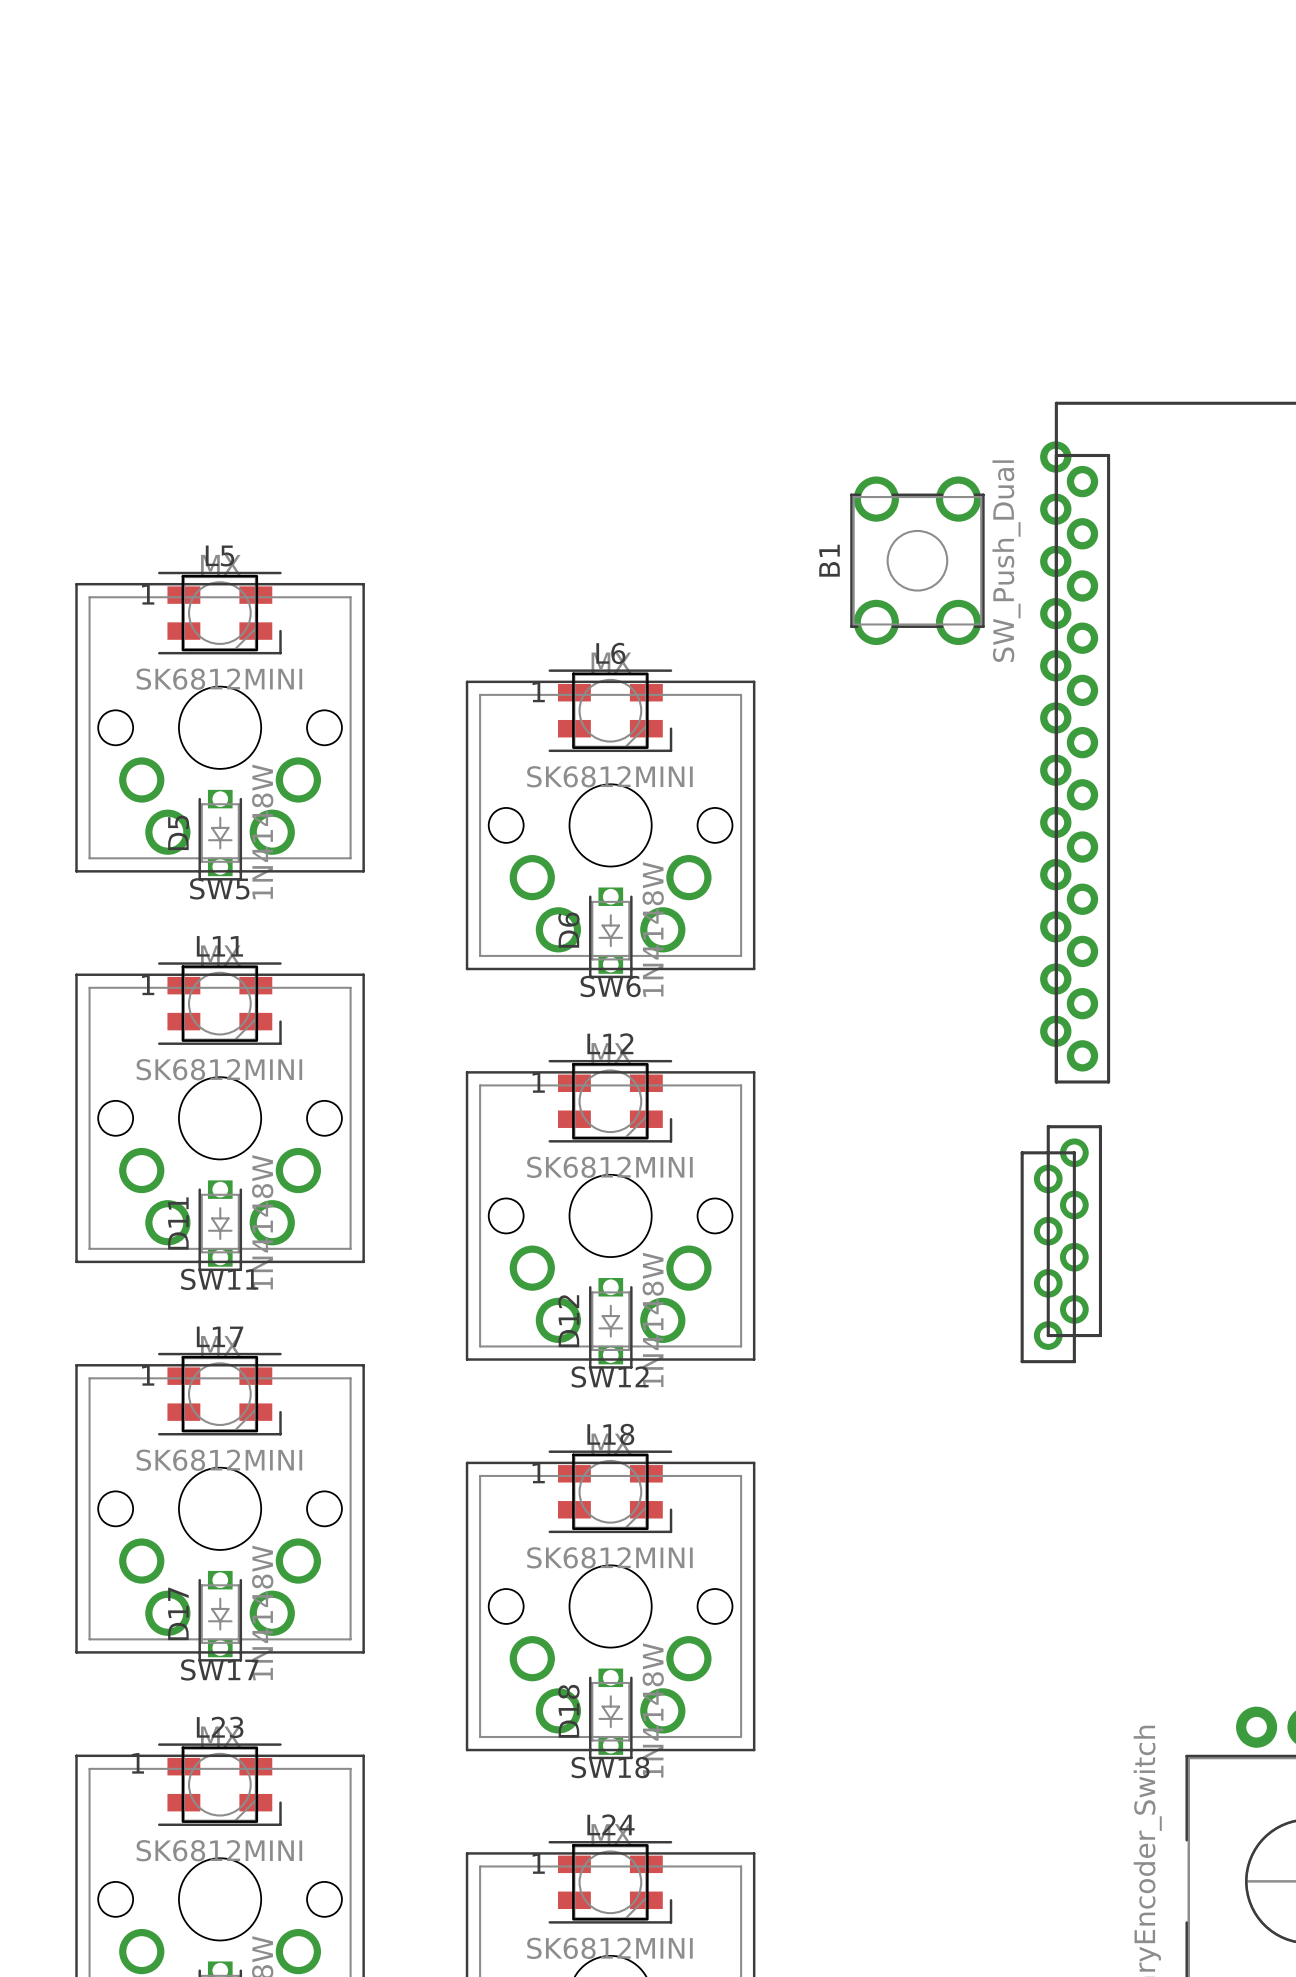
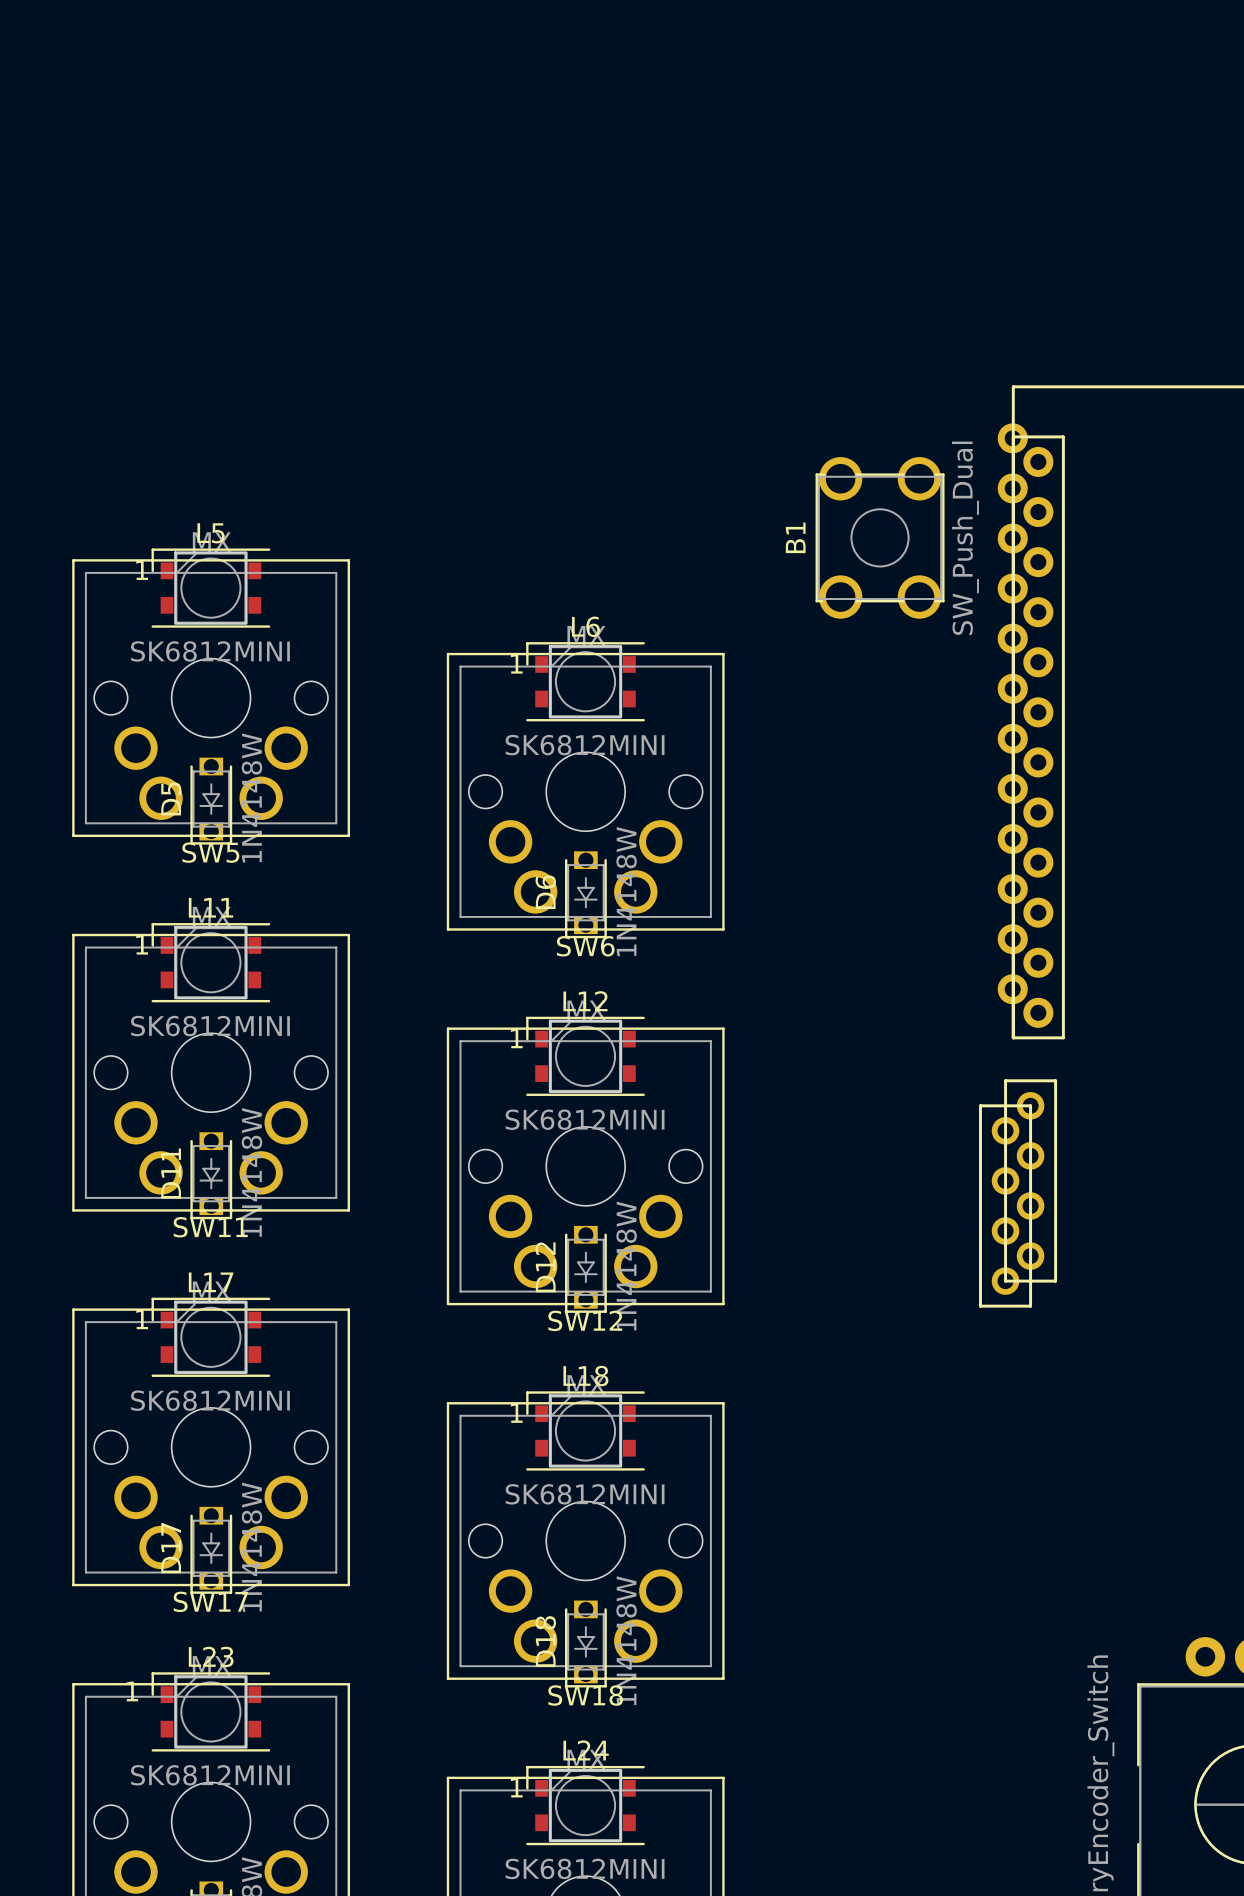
L5 footprint: [157, 571, 282, 655] -> [151, 548, 271, 628]
L6 footprint: [548, 669, 673, 753] -> [526, 642, 645, 722]
L11 footprint: [157, 962, 282, 1045] -> [151, 923, 271, 1003]
L12 footprint: [548, 1059, 673, 1143] -> [526, 1016, 645, 1096]
L17 footprint: [157, 1352, 282, 1436] -> [151, 1297, 271, 1377]
L18 footprint: [548, 1450, 673, 1534] -> [526, 1391, 645, 1471]
L23 footprint: [157, 1743, 282, 1827] -> [151, 1672, 271, 1752]
L24 footprint: [548, 1841, 673, 1924] -> [526, 1765, 645, 1846]

